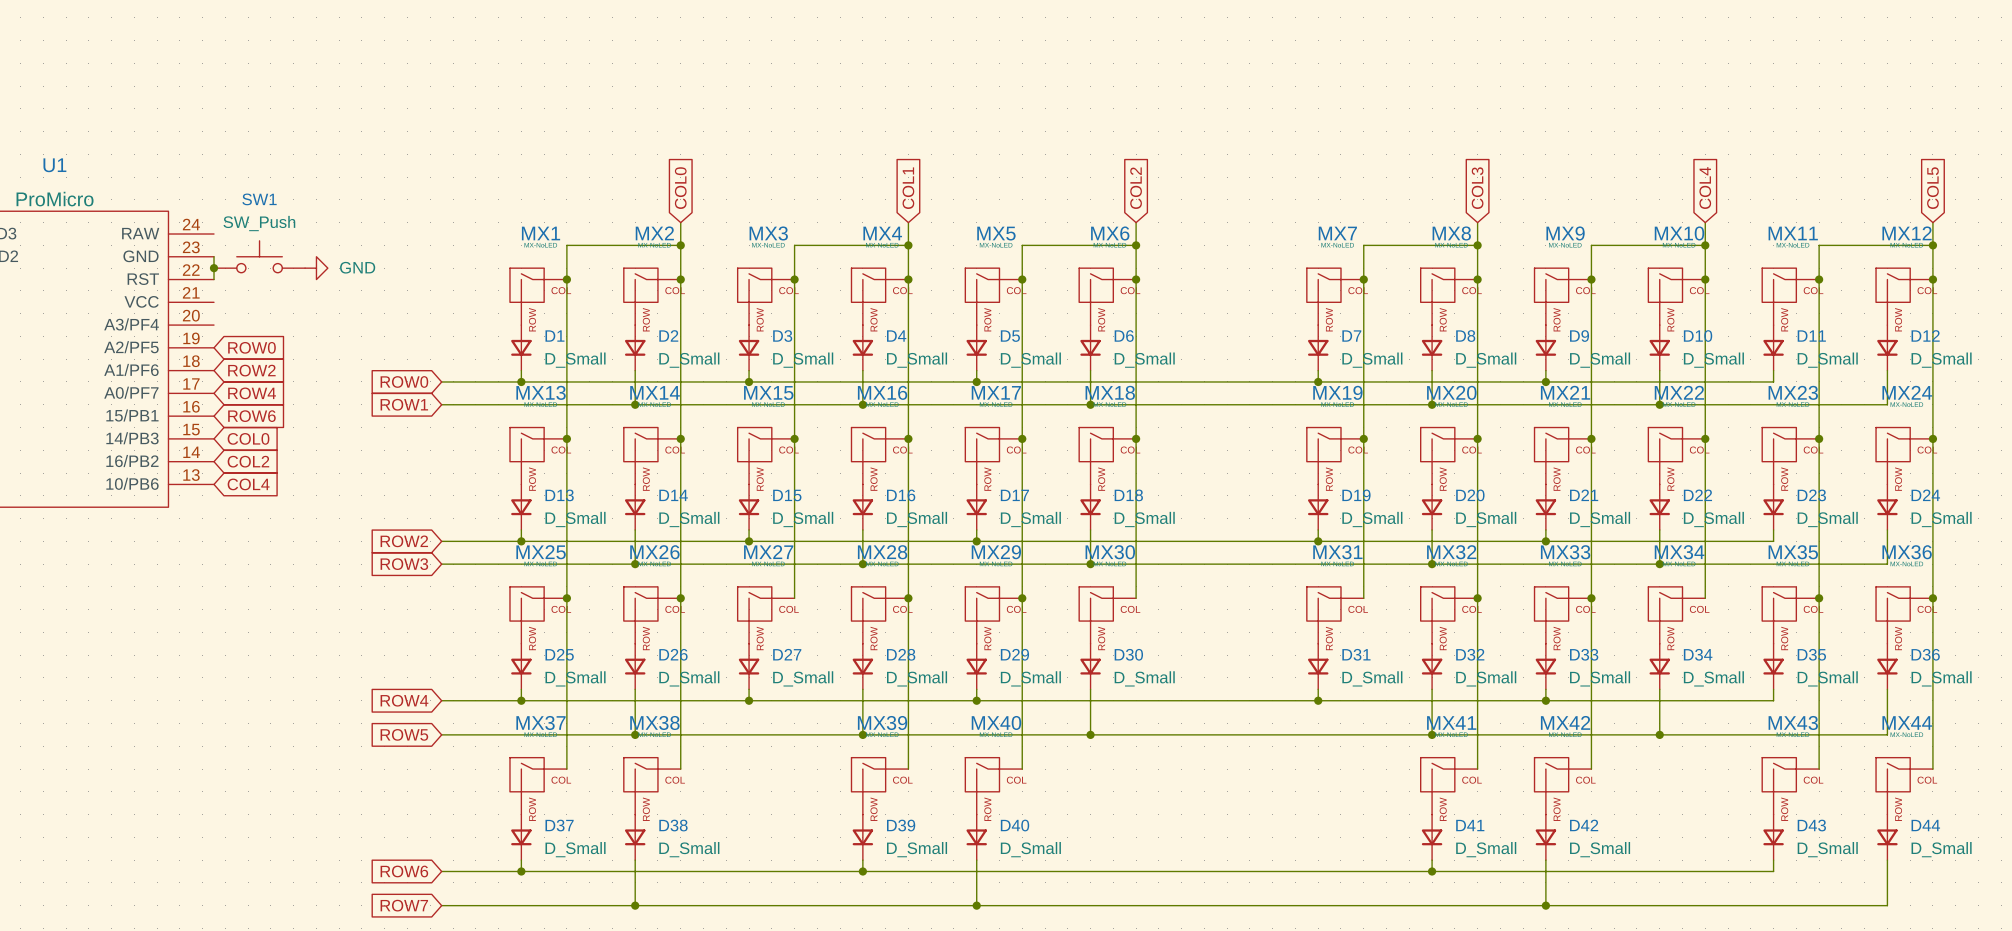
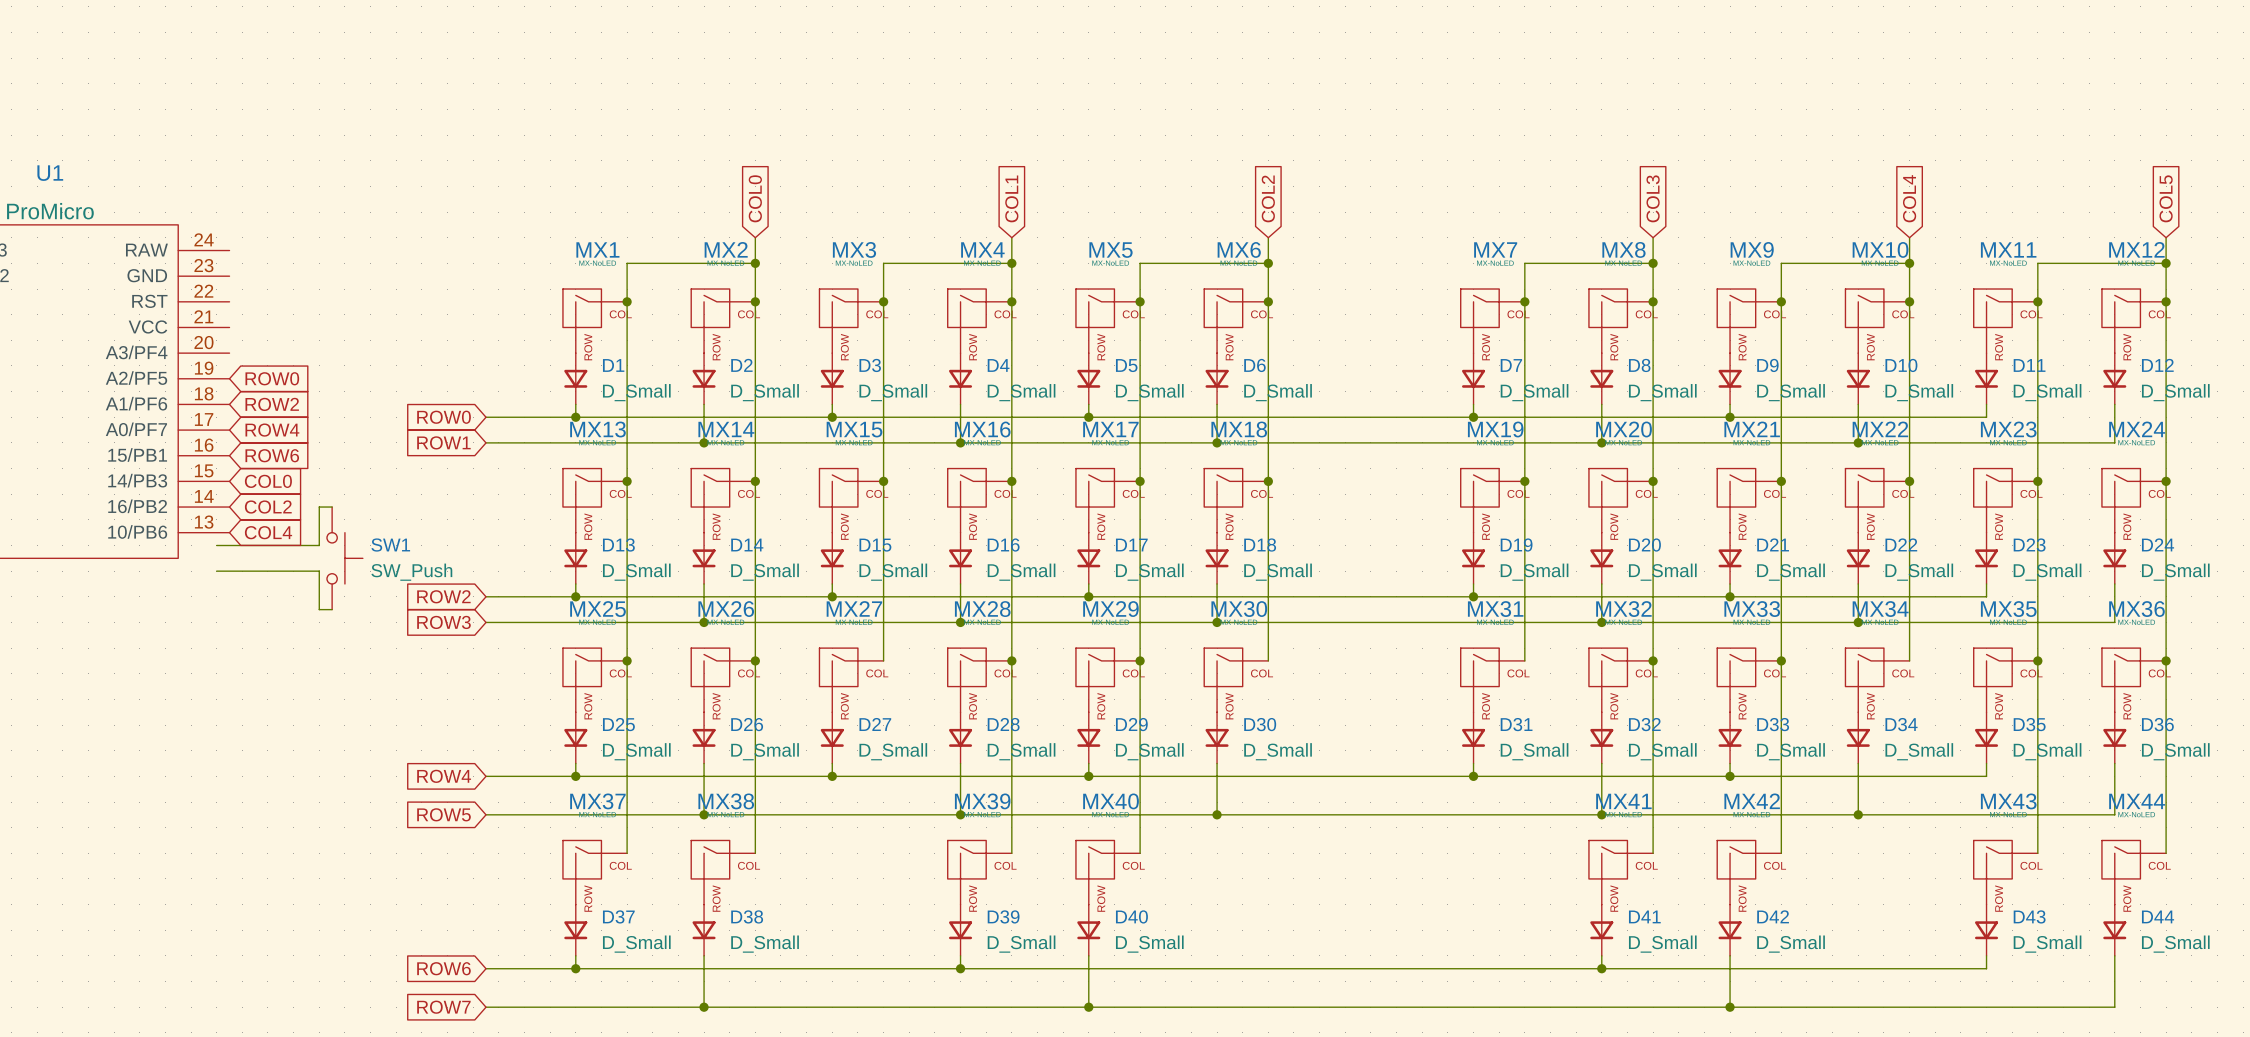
SW1 value position: SW_Push (259, 223) -> SW_Push (411, 572)
wire: (214, 256) (214, 279) -> none
SW1 rotation: 0° (259, 256) -> 90° clockwise (344, 558)
SW1 position: (259, 256) -> (344, 558)
junction: (214, 268) -> none
power symbol: GND (316, 268) -> none
wire: none -> (332, 507) (319, 507) (319, 545) (216, 545)
wire: none -> (216, 571) (319, 571) (319, 609) (332, 609)

